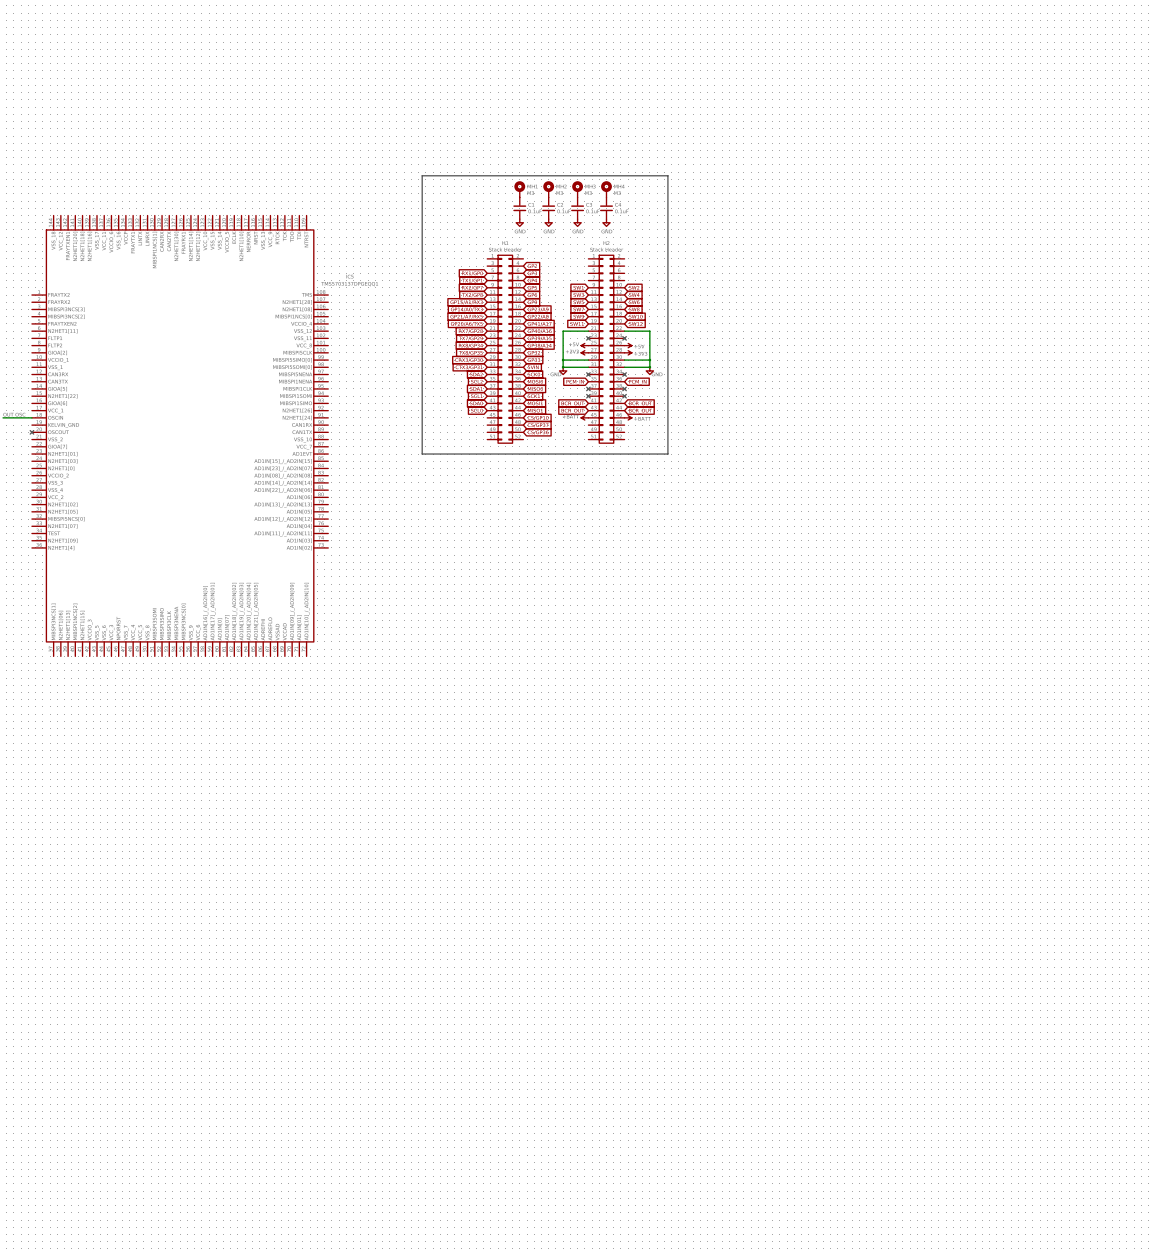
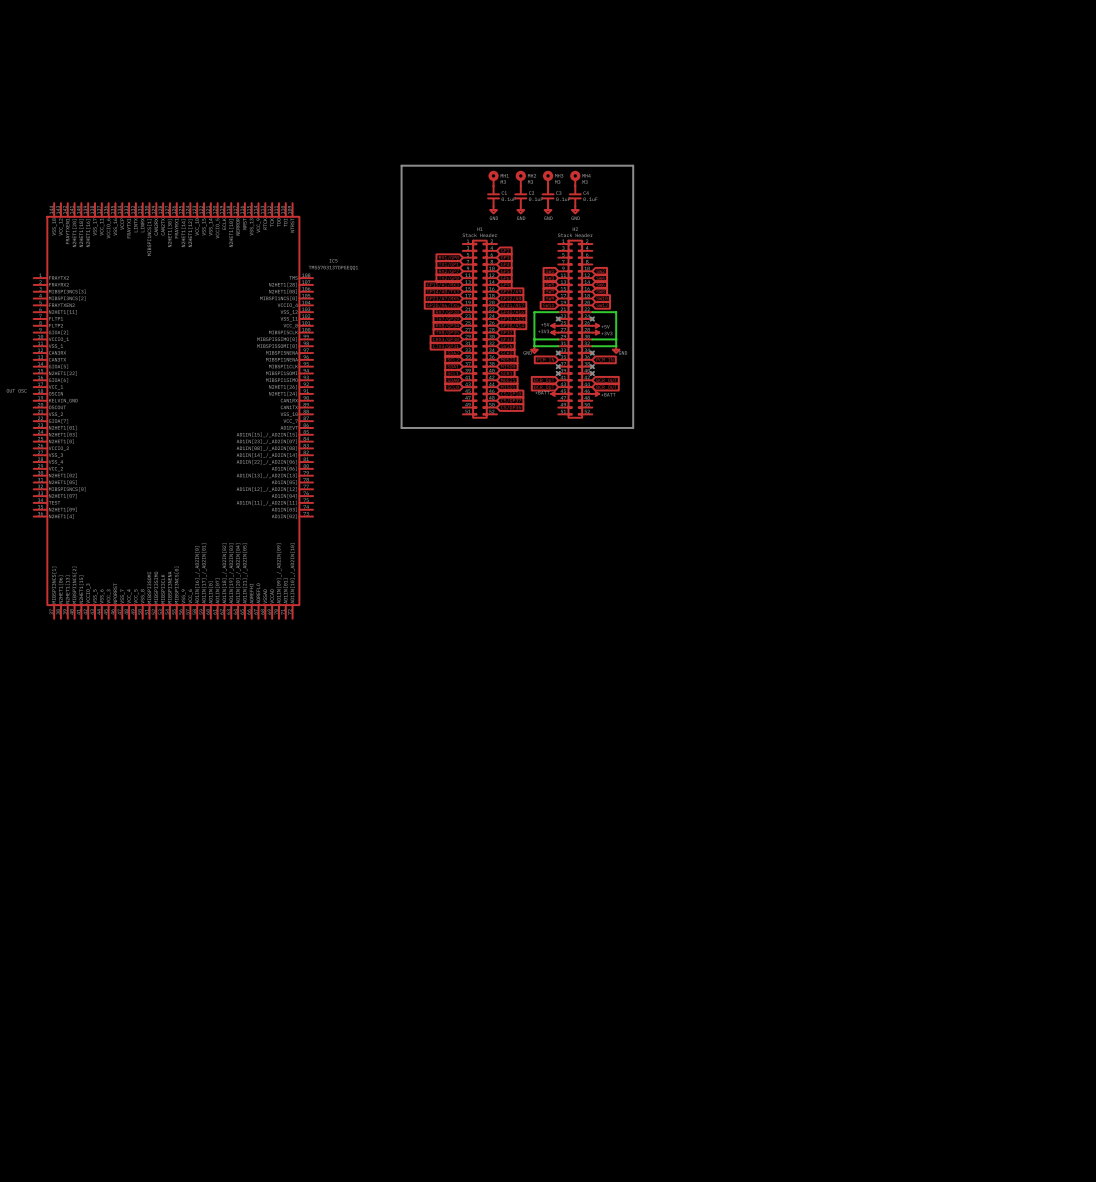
wire: (3, 417) (31, 417) -> none
no-connect mark: (31, 432) -> none

